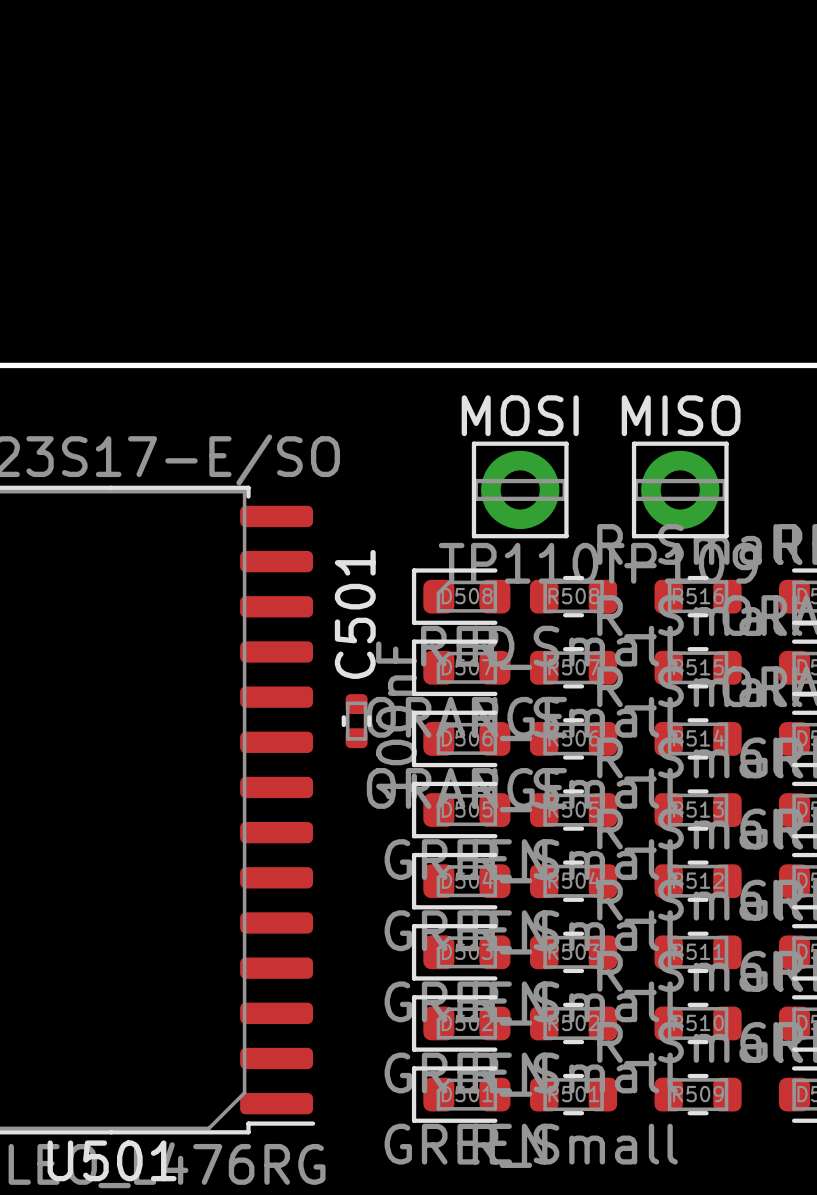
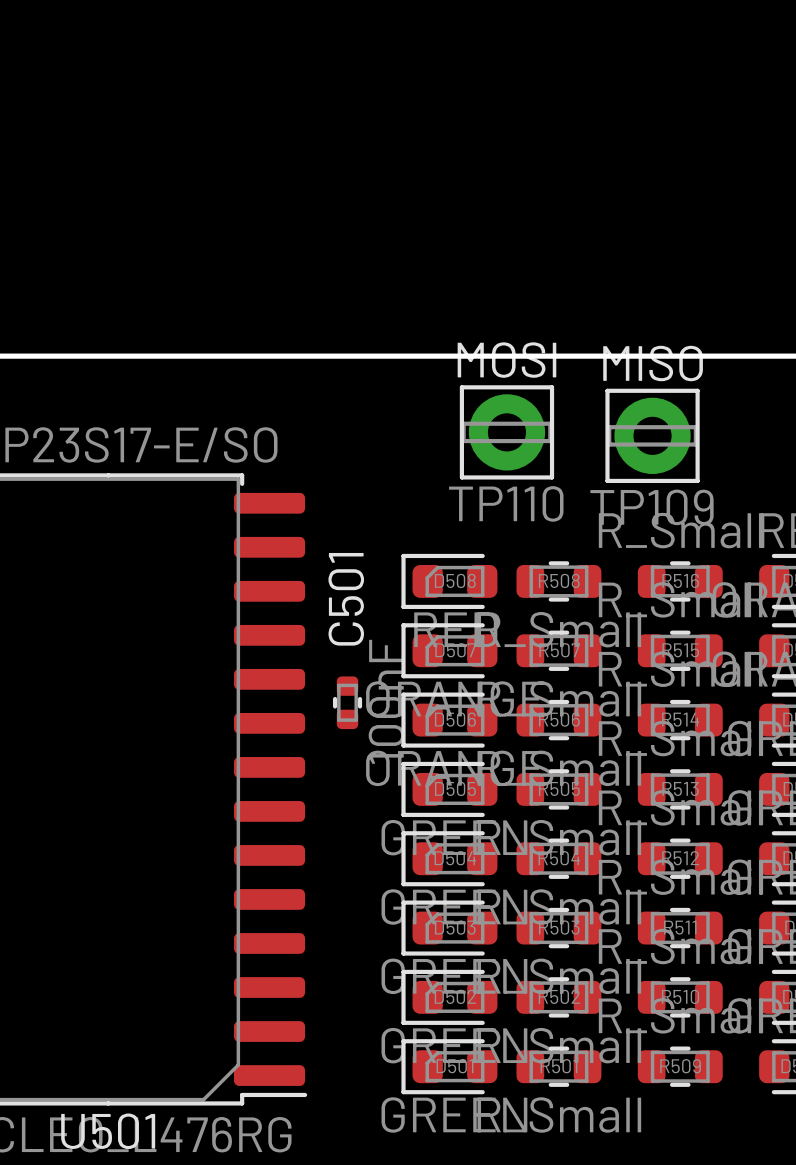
TP110 position: (520, 489) -> (506, 432)
TP109 position: (680, 489) -> (652, 435)

